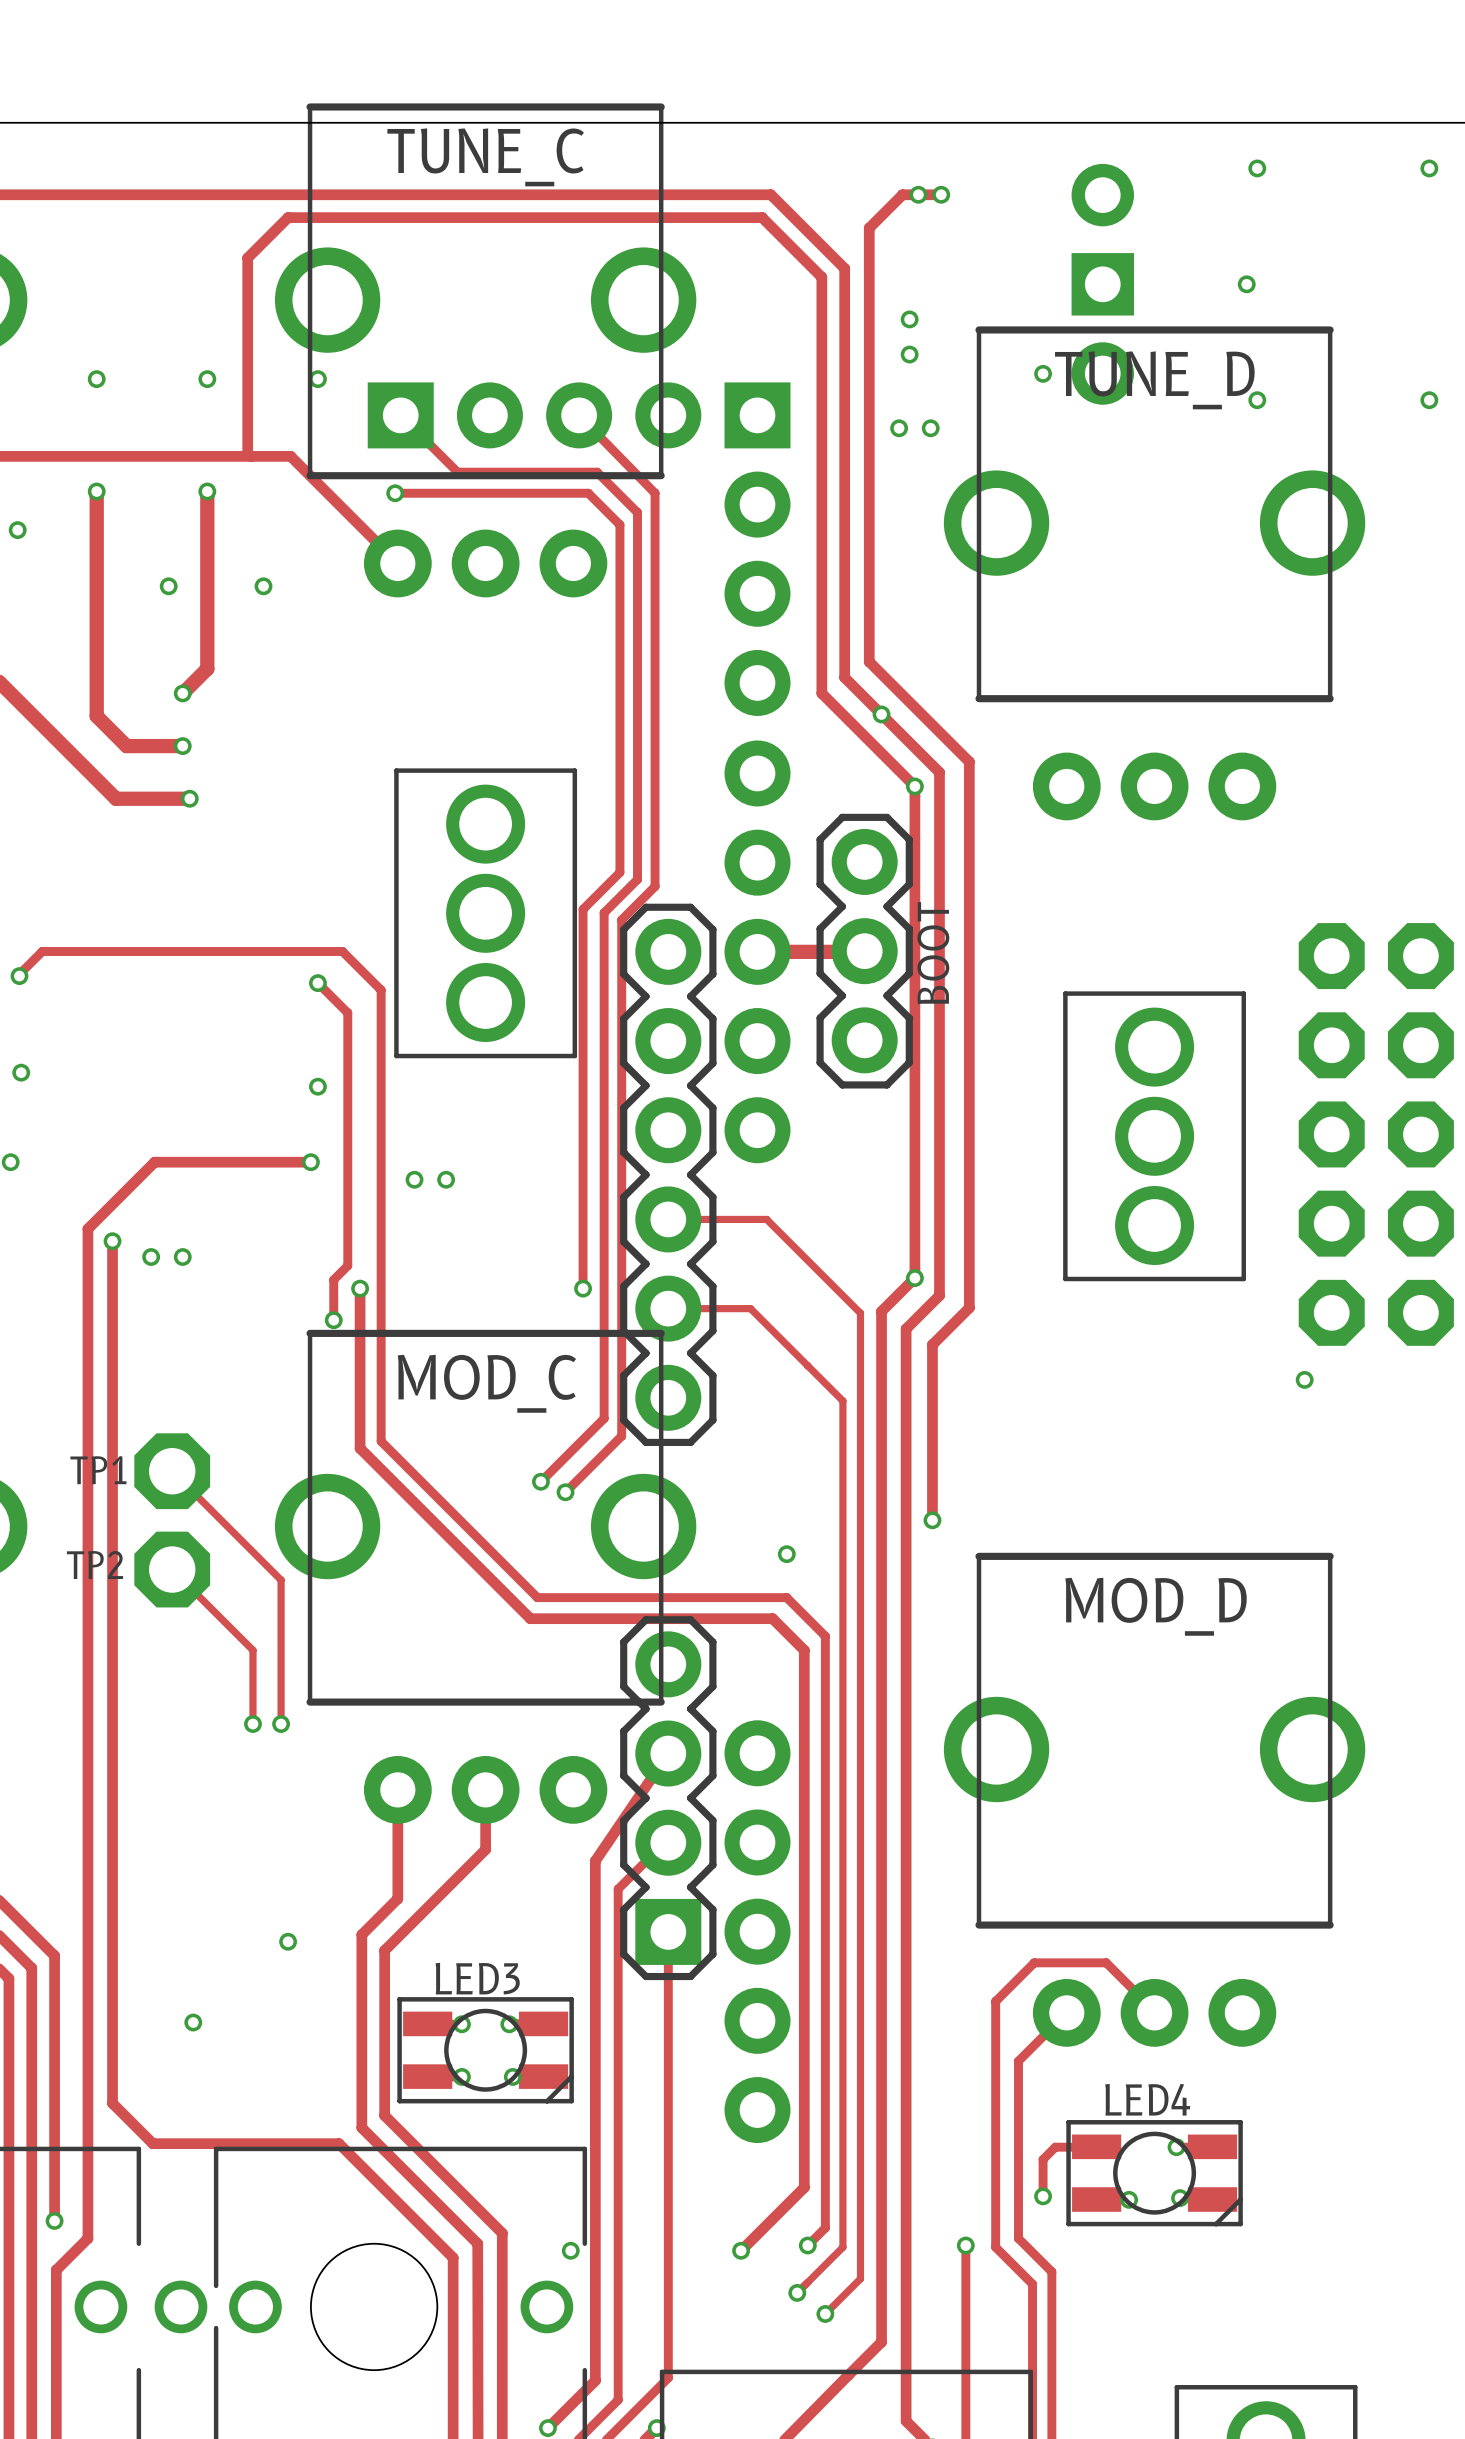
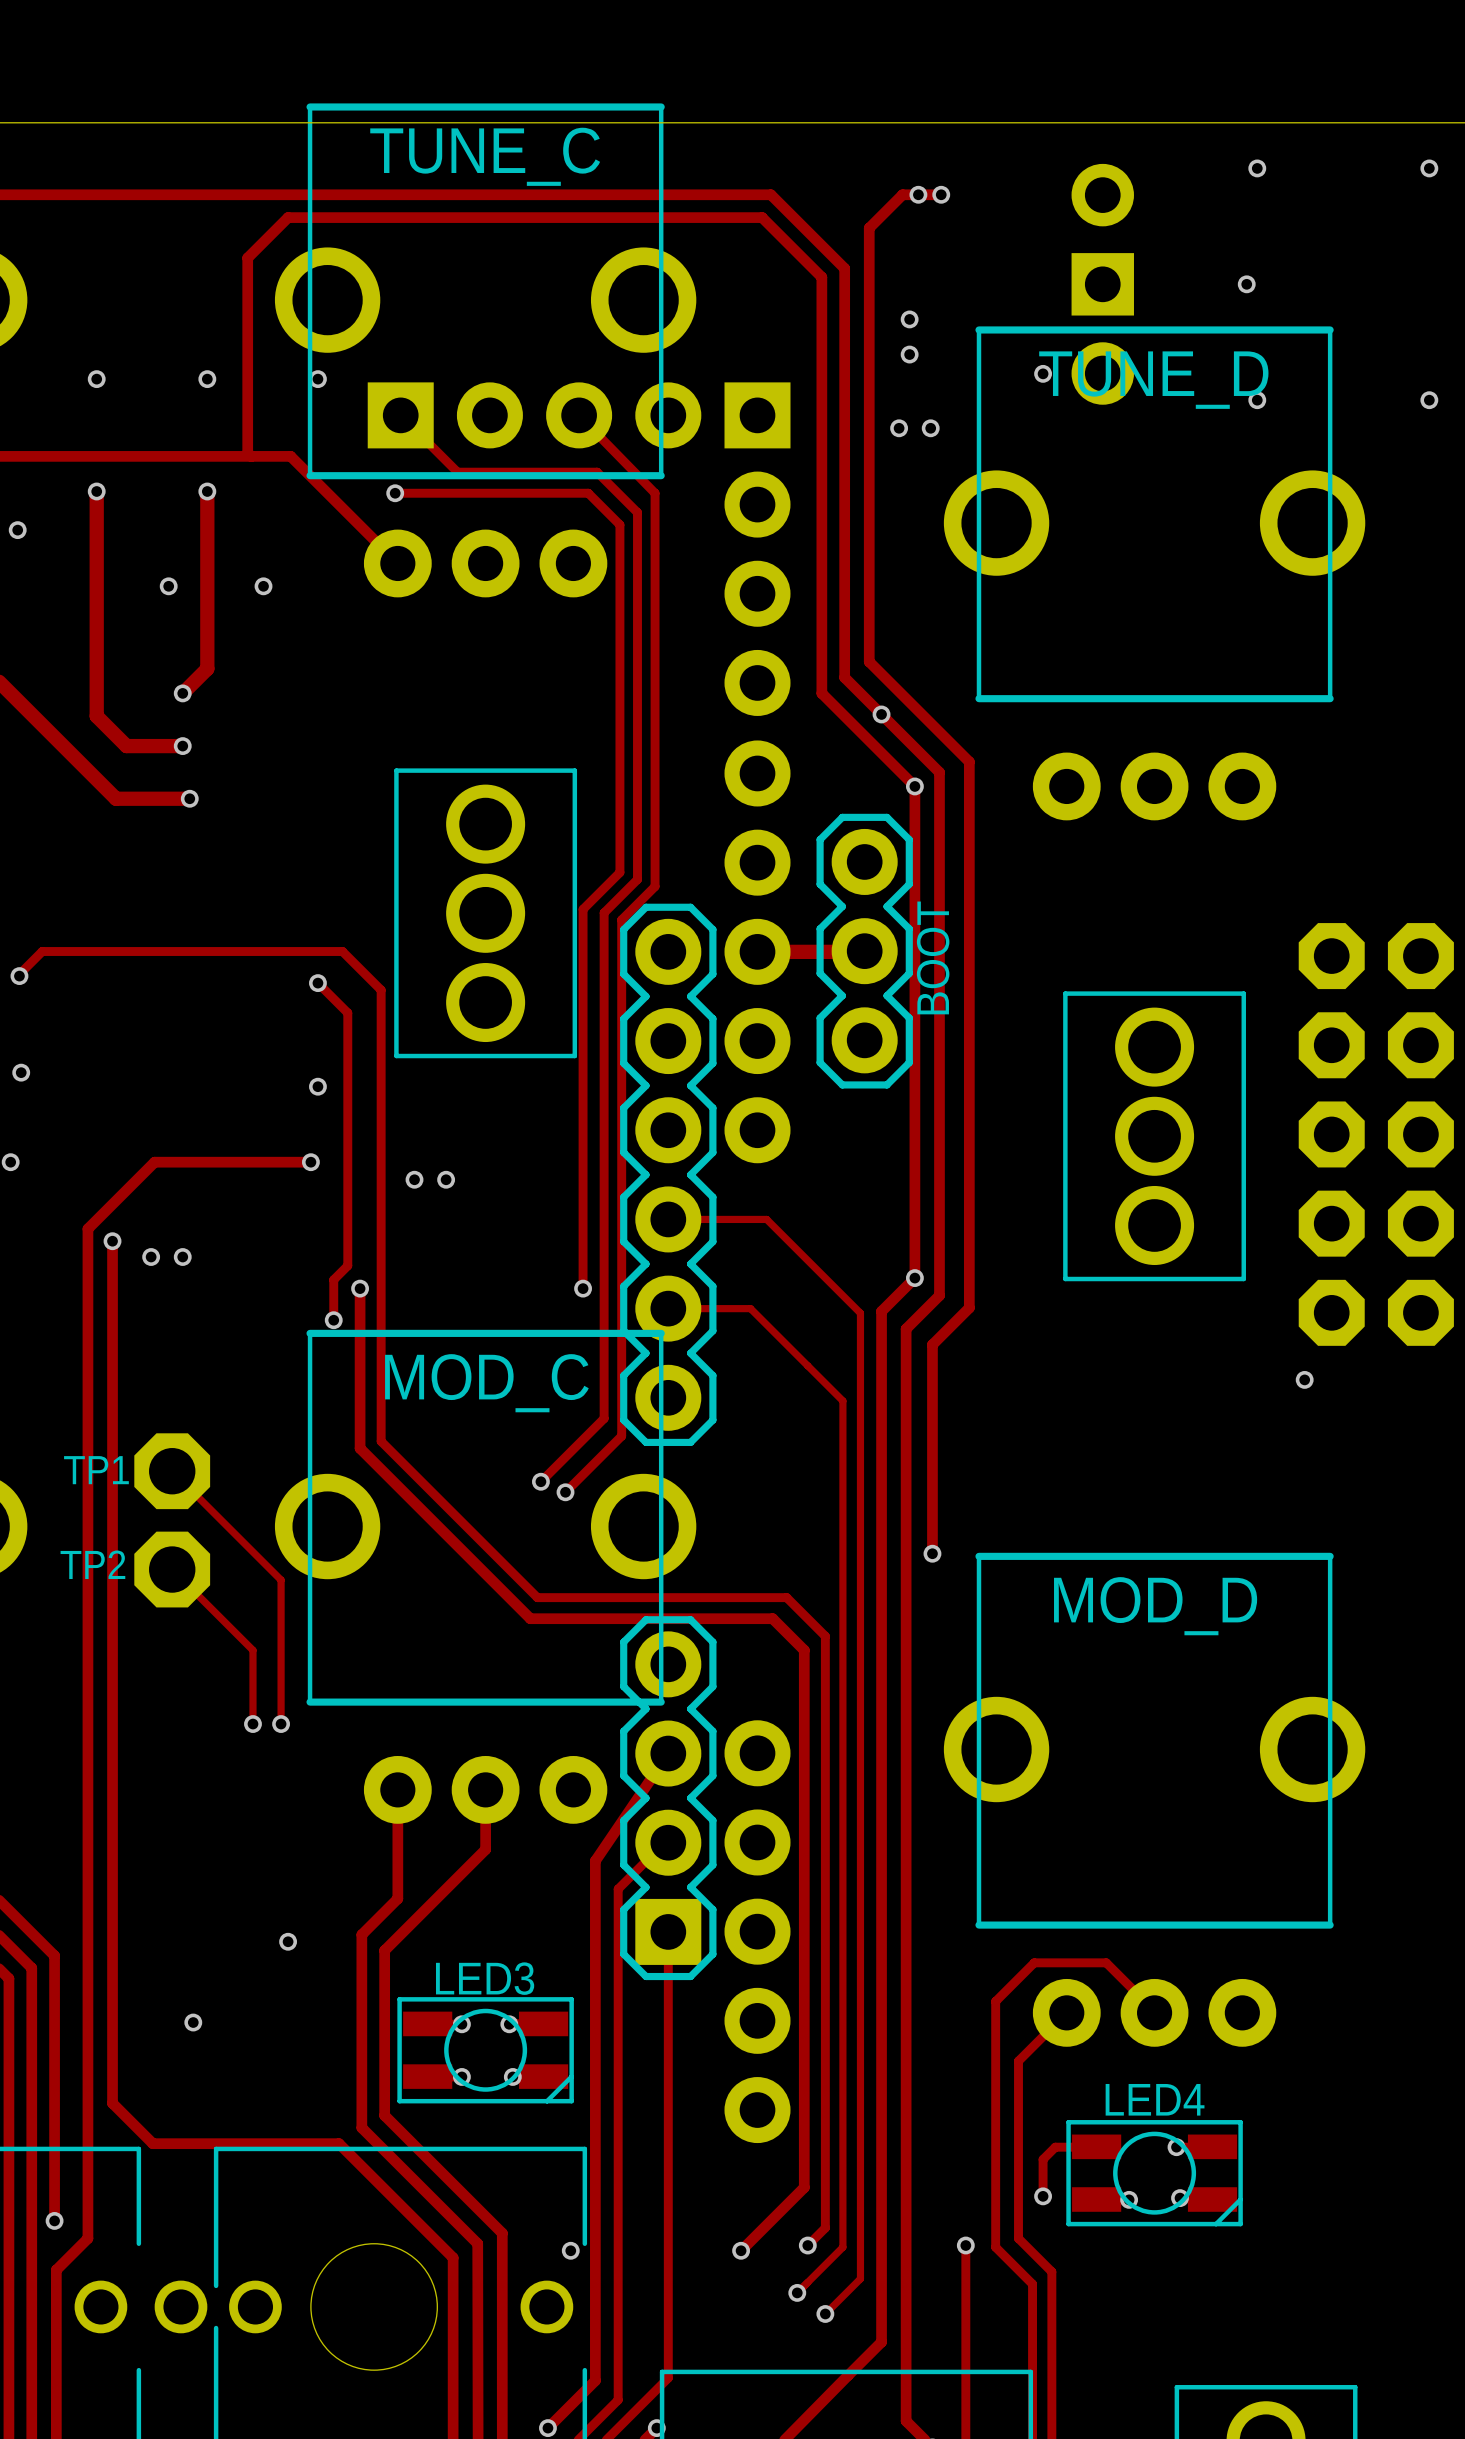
track: none -> (932, 1520) (932, 1553)
via position: (932, 1520) -> (932, 1553)
via: (786, 1554) -> none

